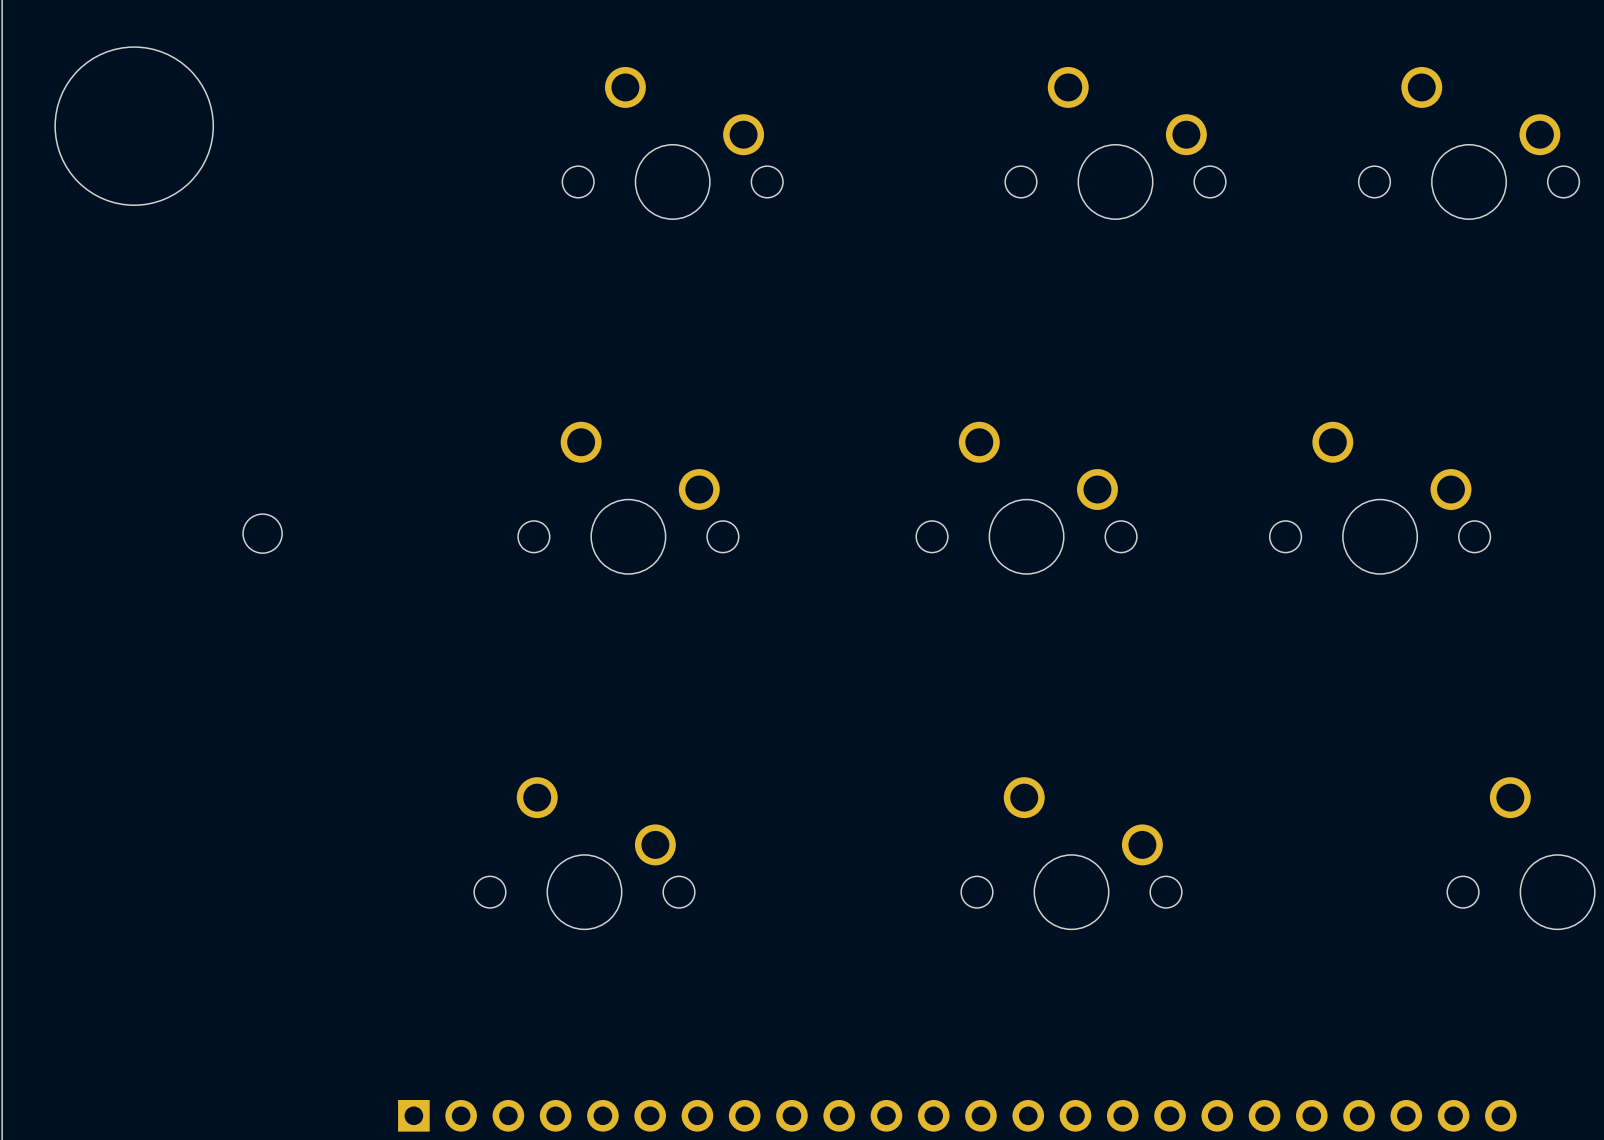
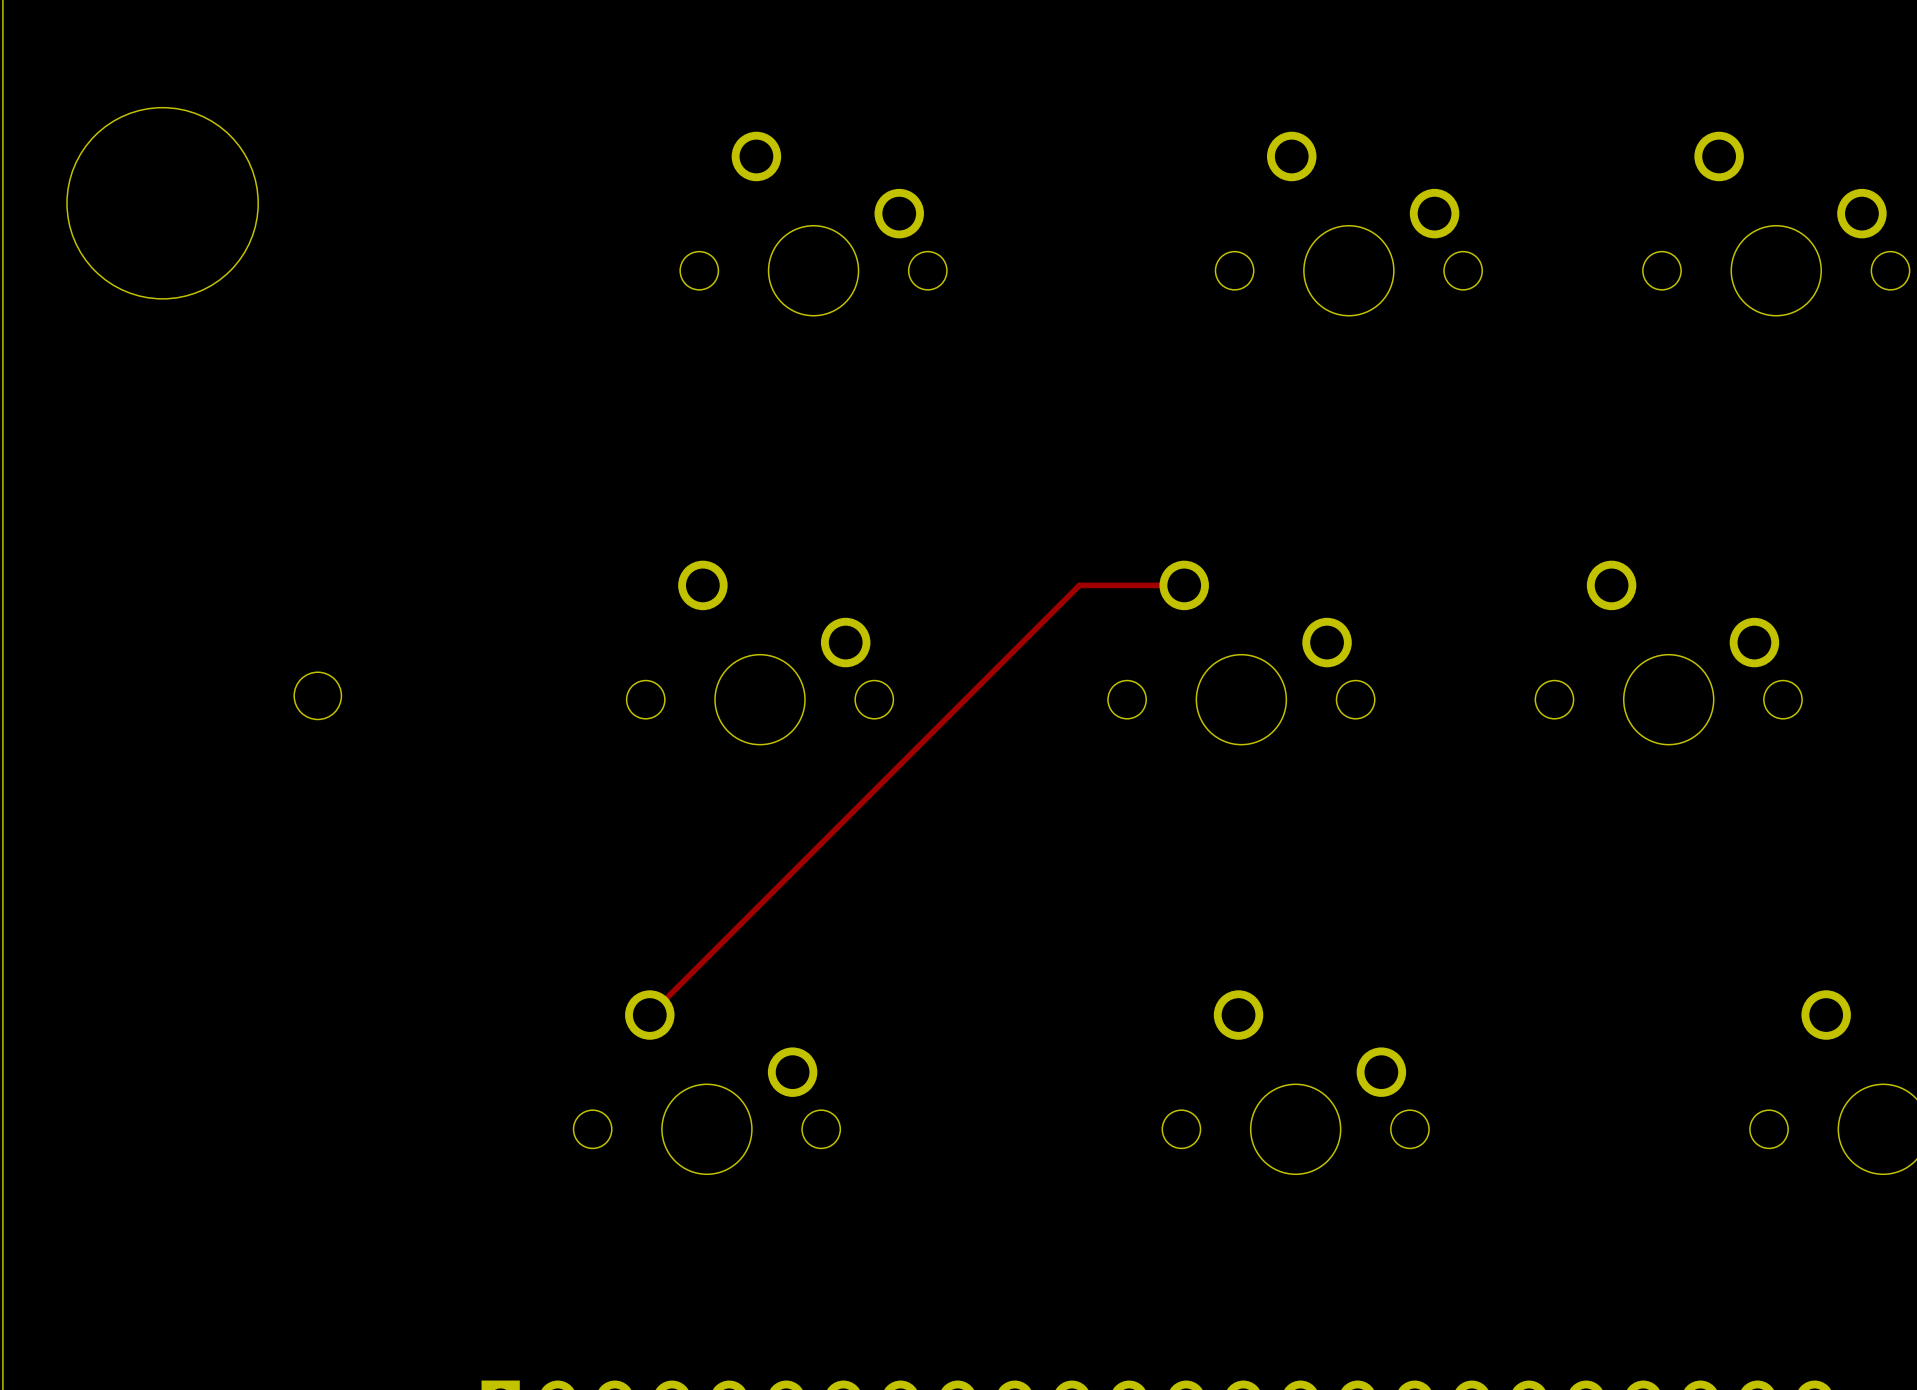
top track: none -> (1184, 585) (1079, 585) (649, 1015)

